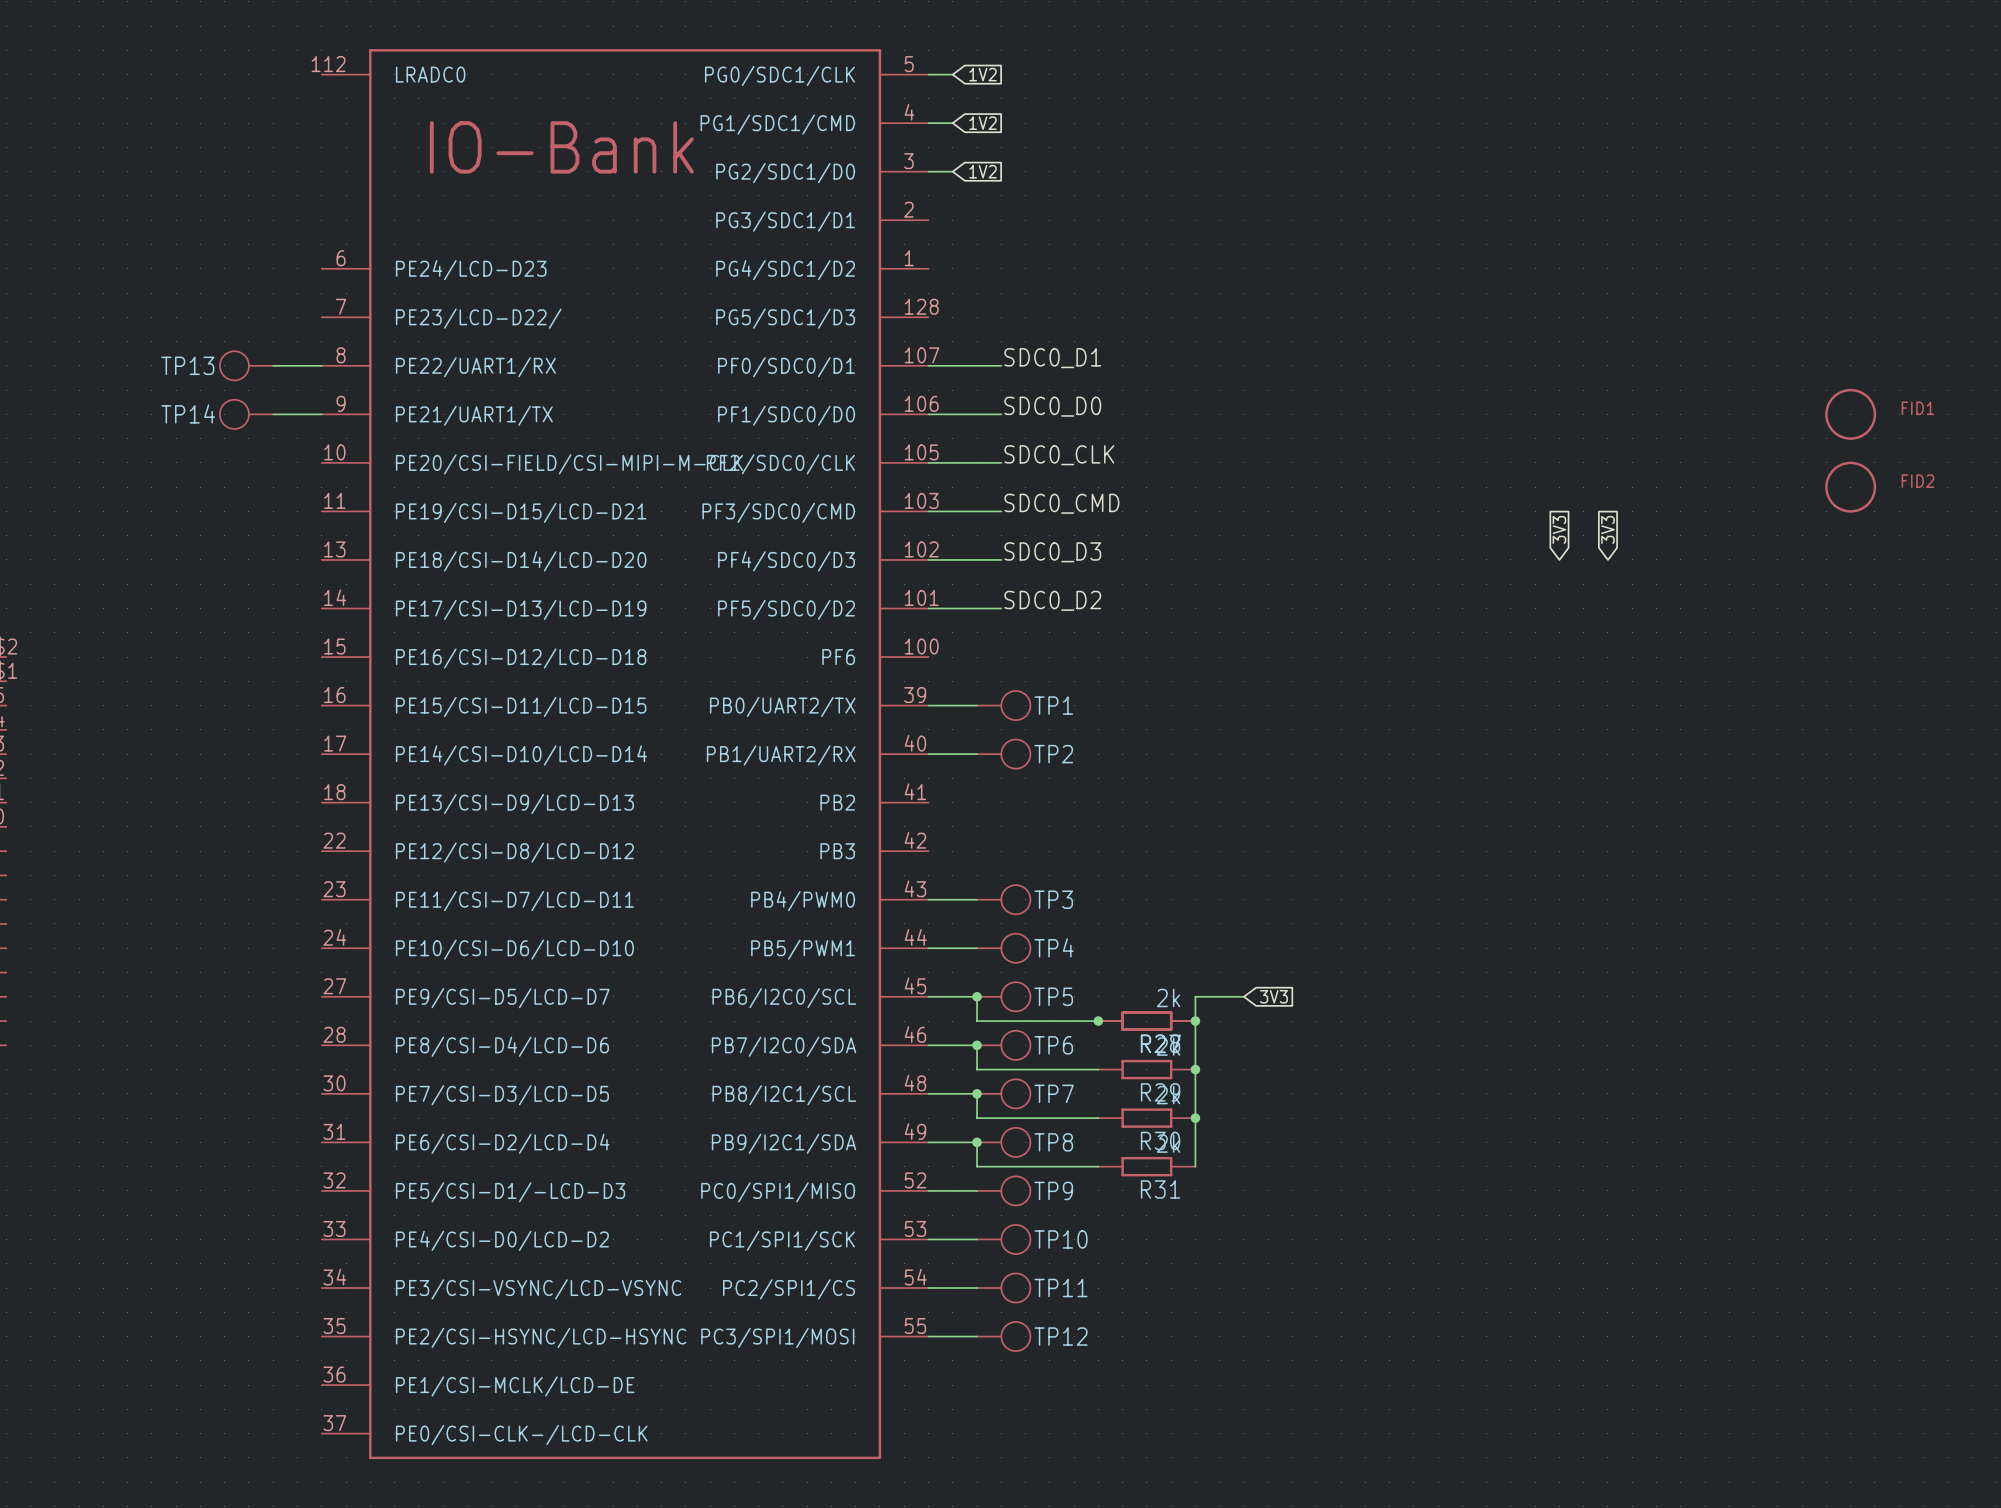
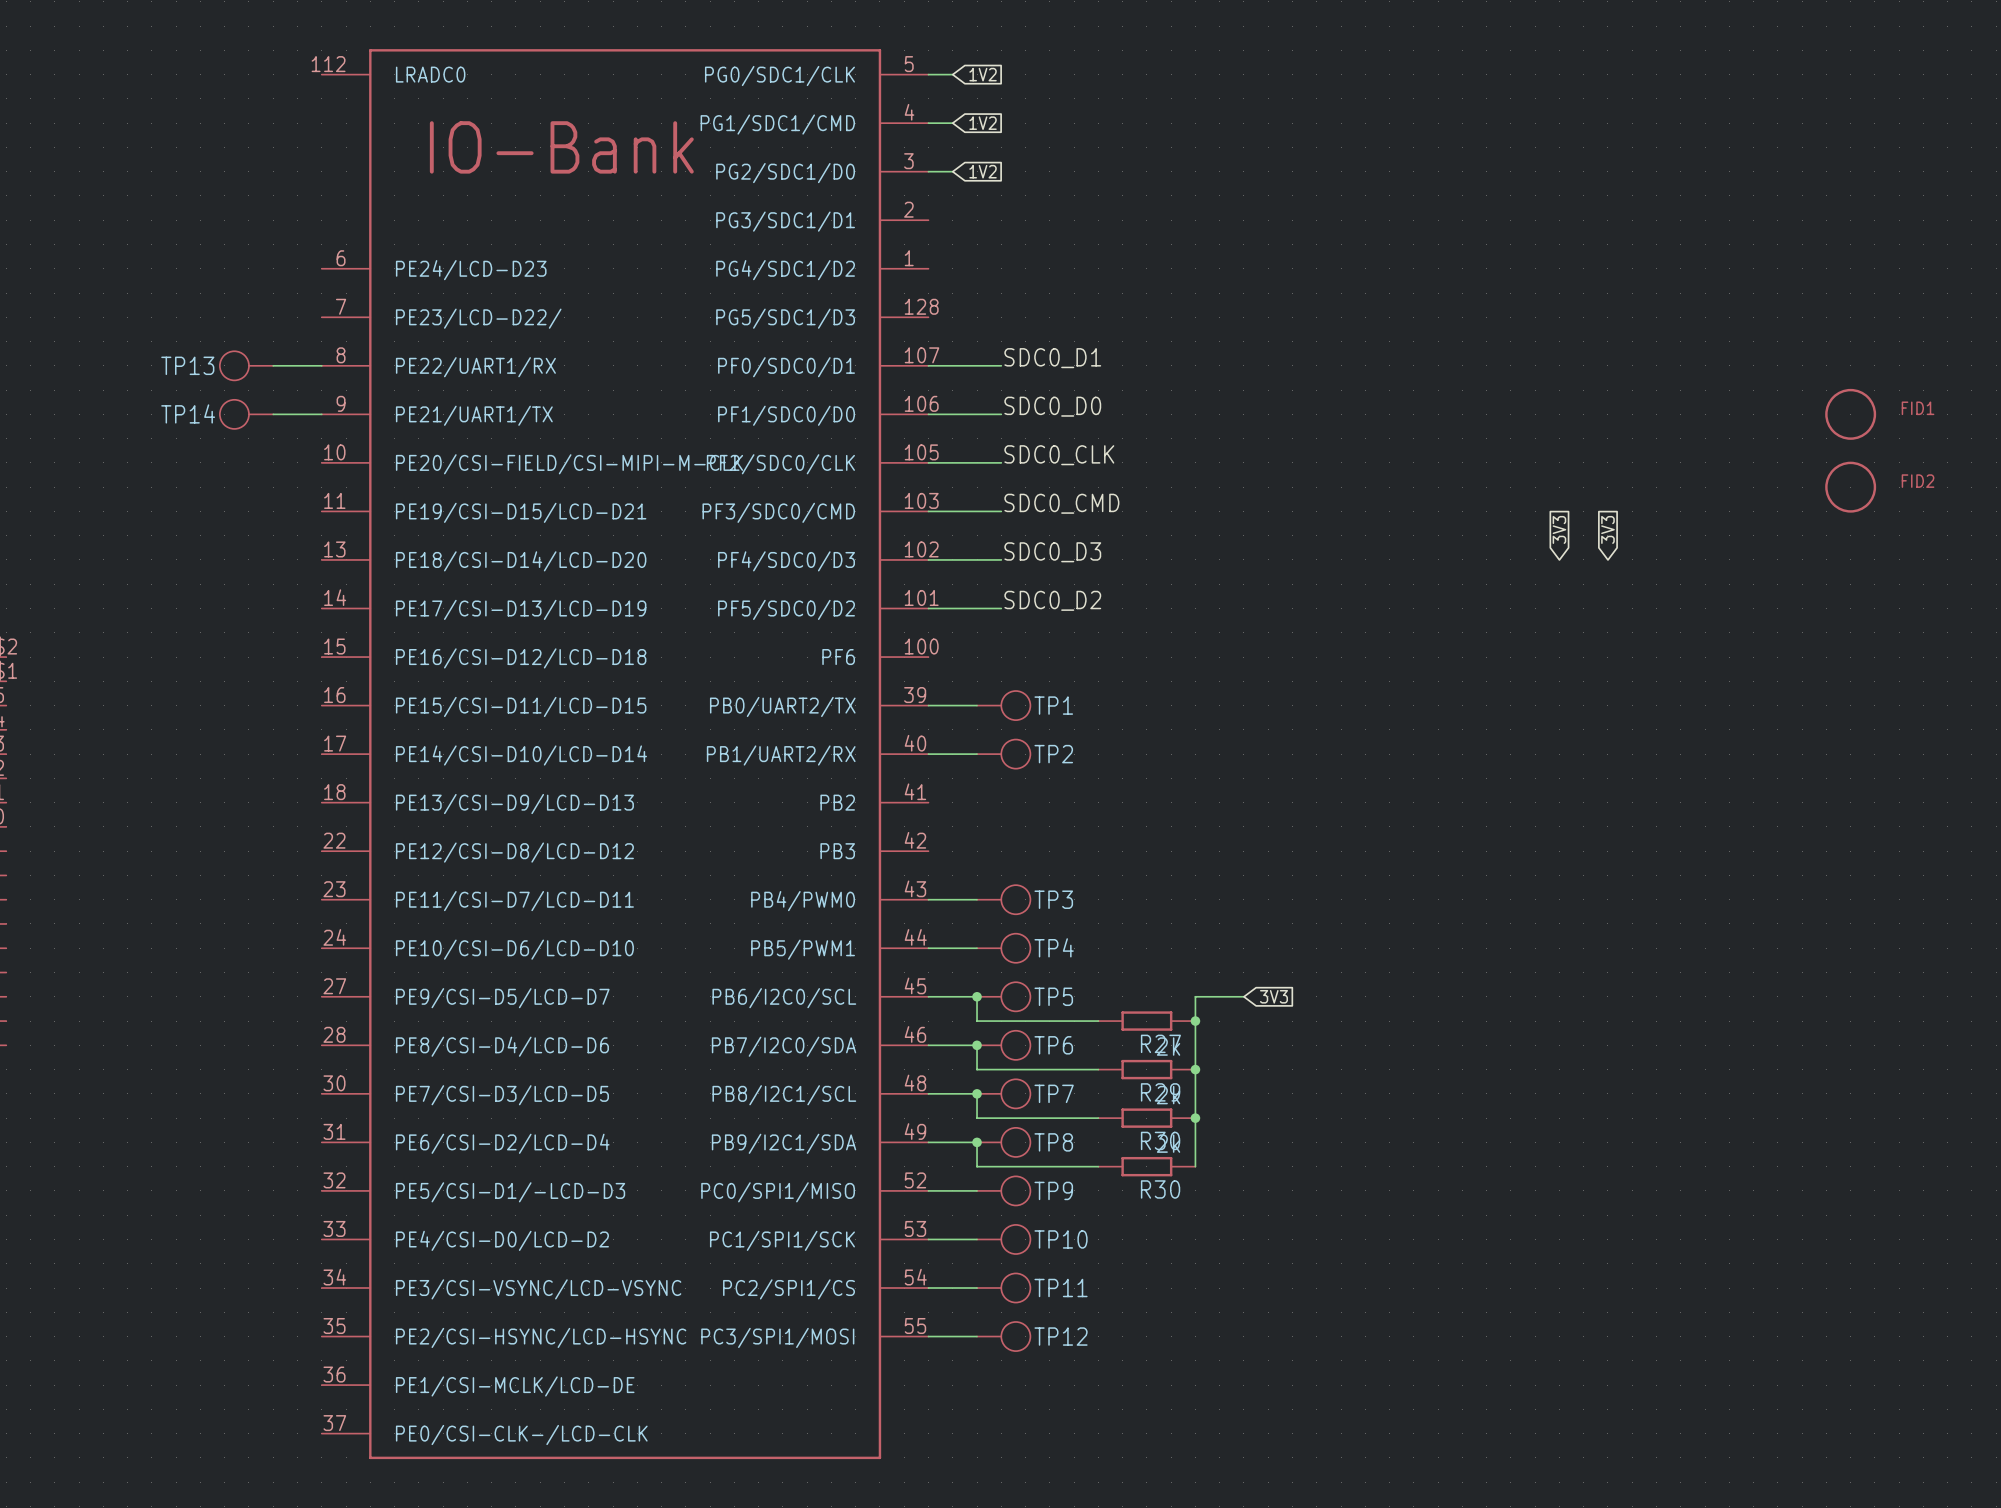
junction: (1098, 1021) -> none
part: 2k (1146, 1021) -> none
R31 name: R31 (1160, 1189) -> R30 (1160, 1189)

